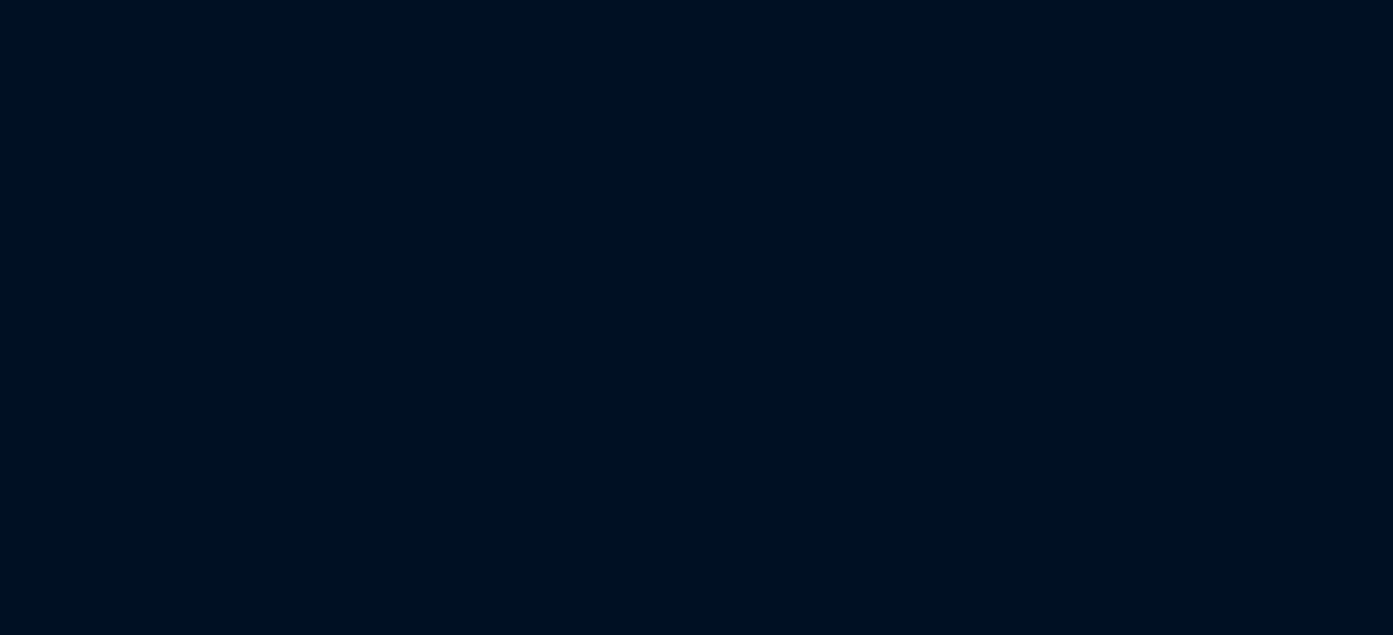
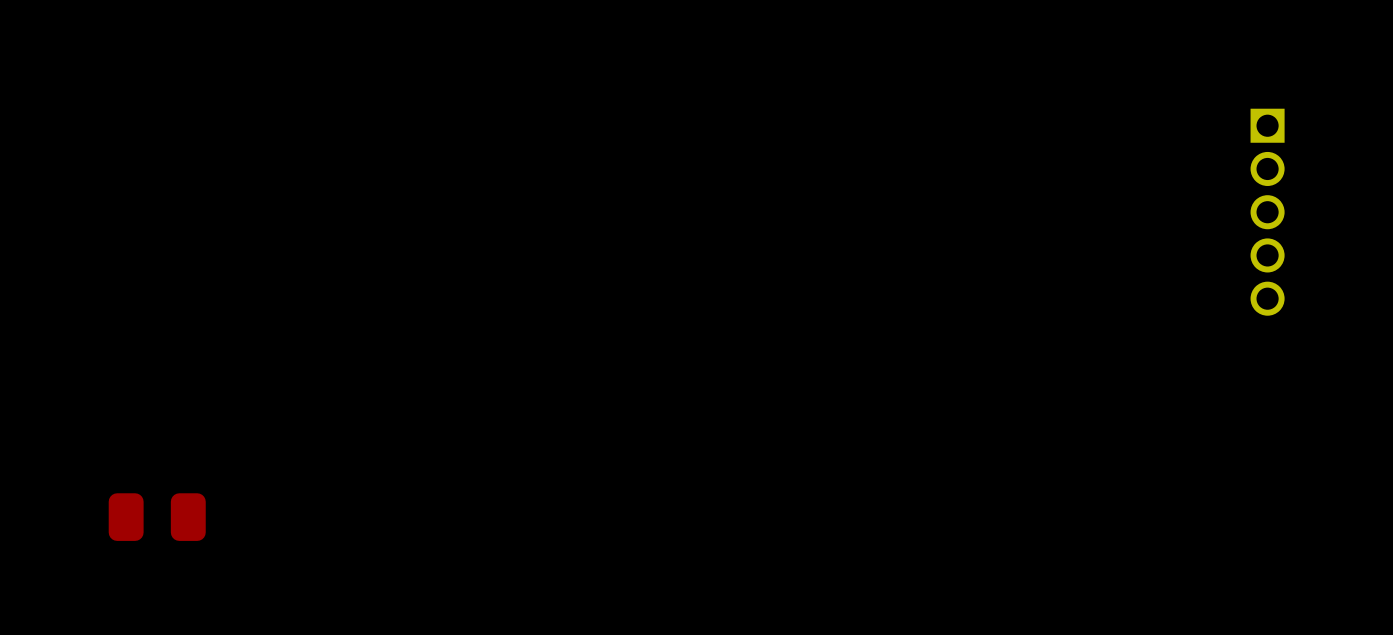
part: none -> (1267, 212)
part: none -> (157, 517)

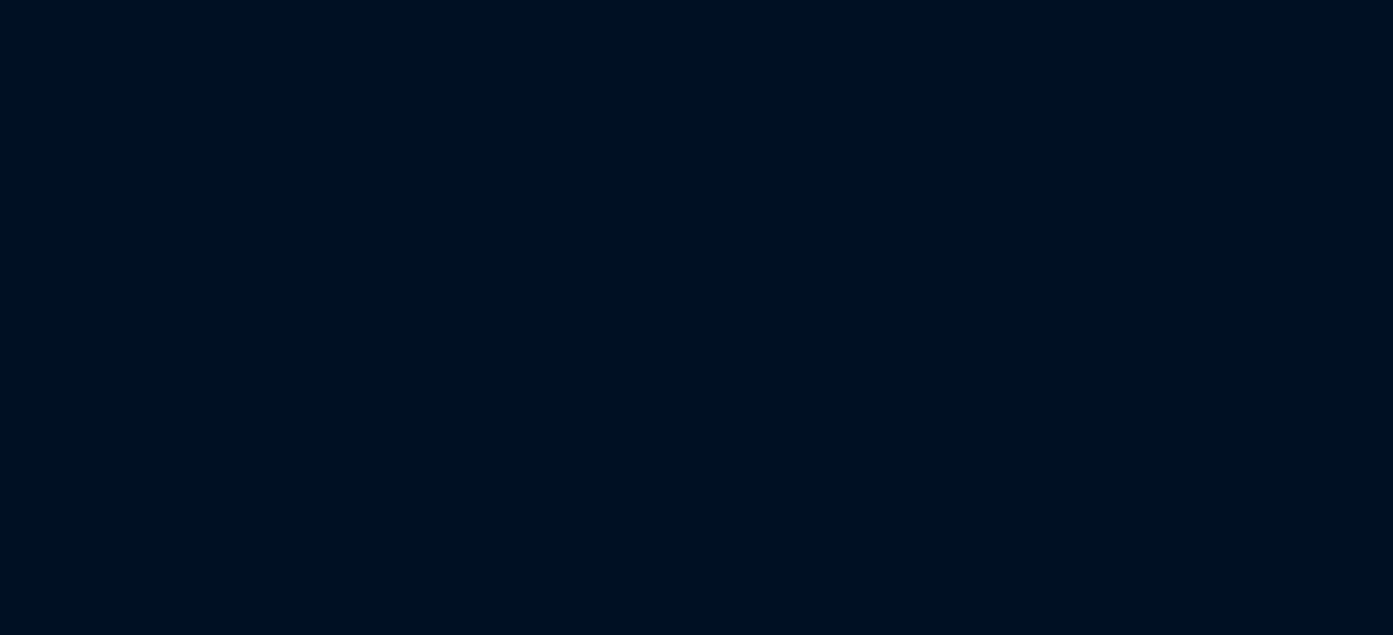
part: (1267, 212) -> none
part: (157, 517) -> none

